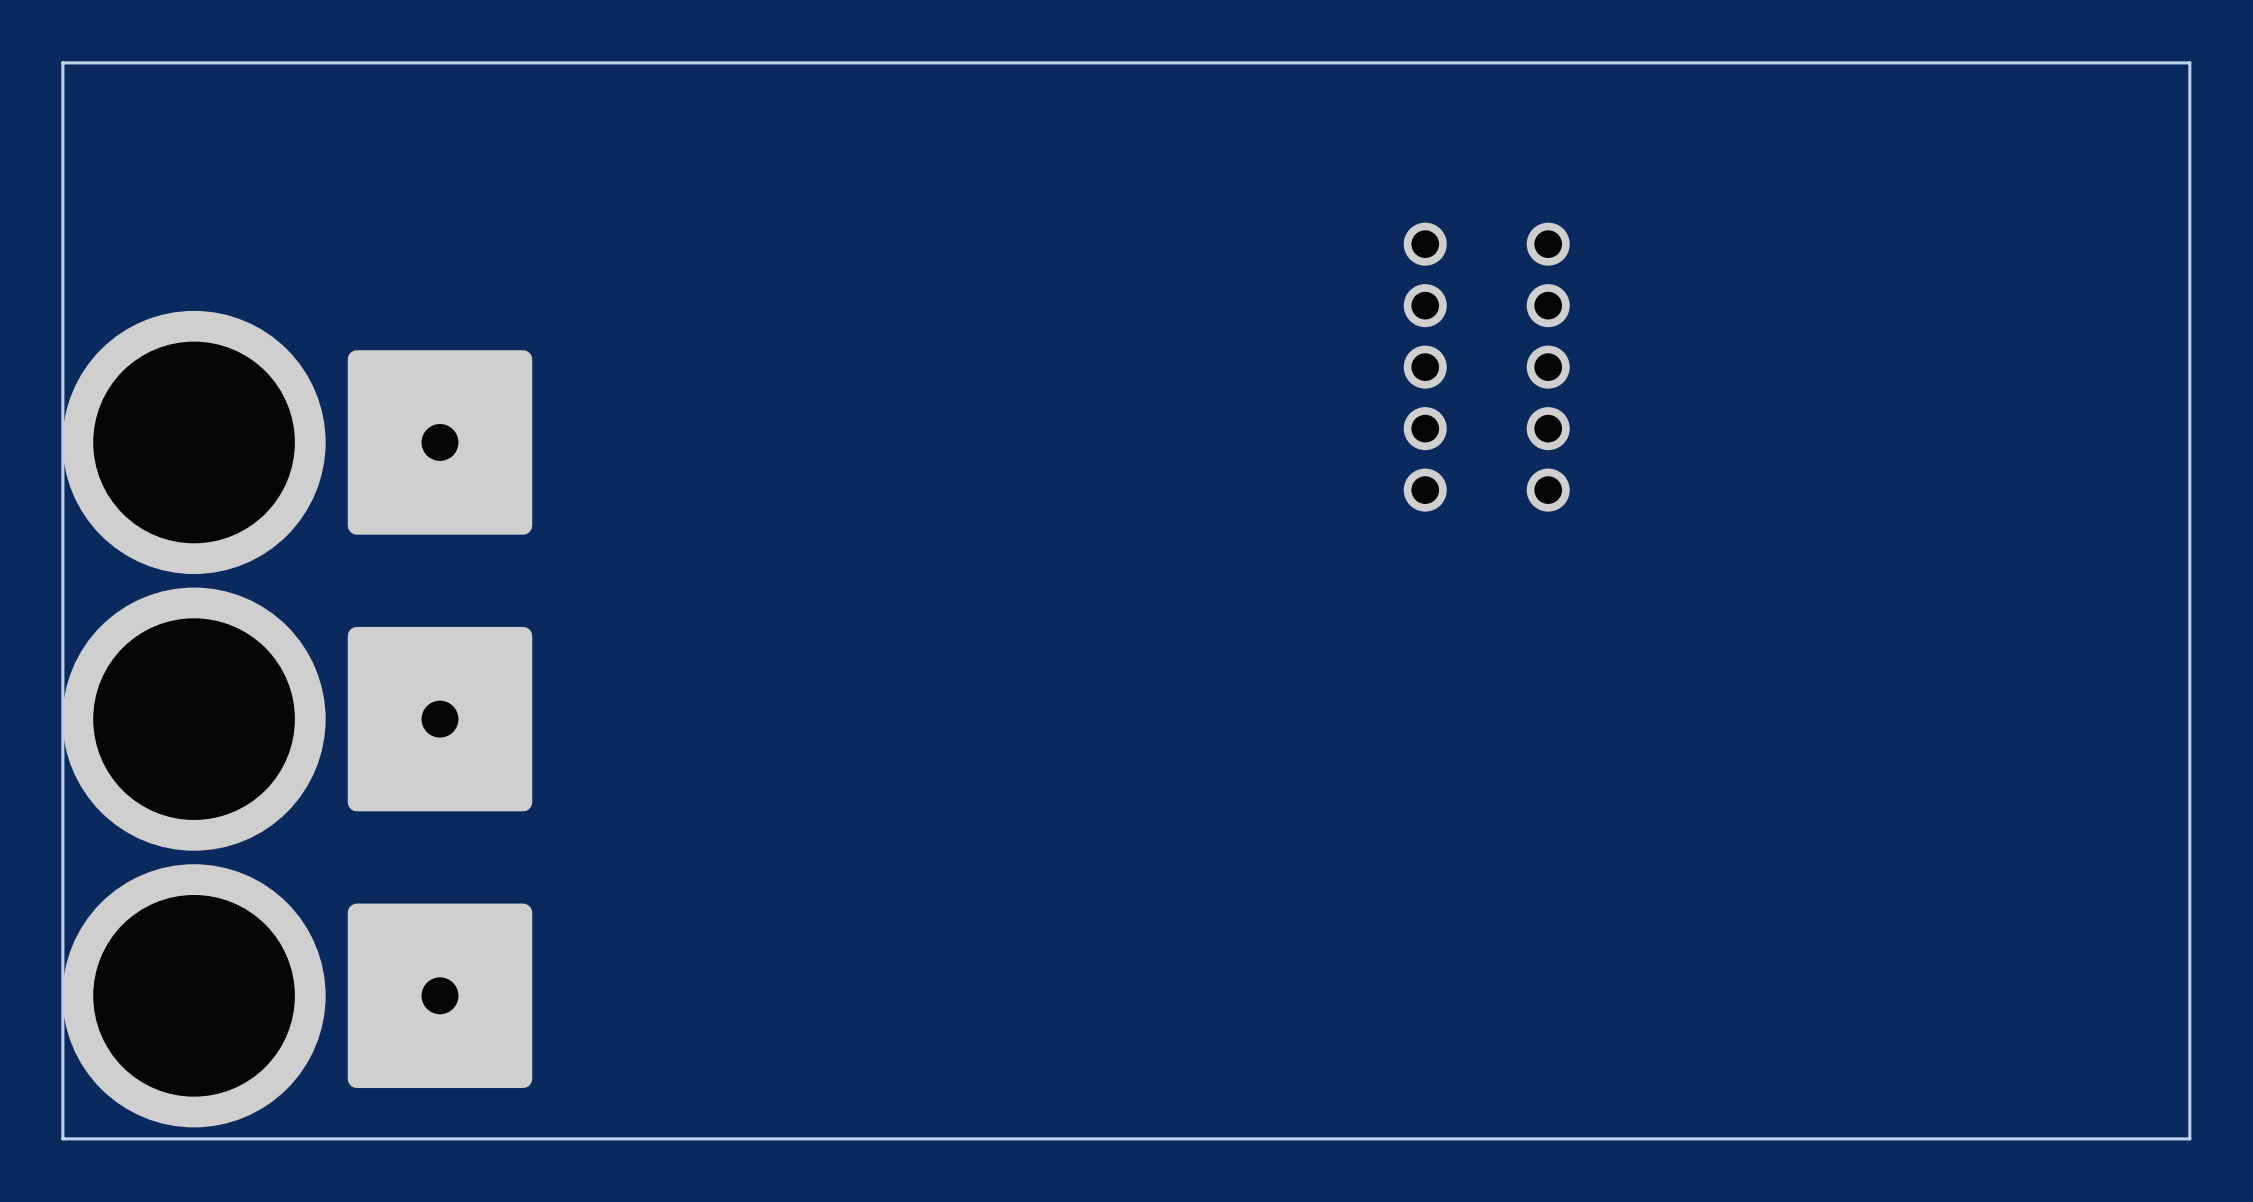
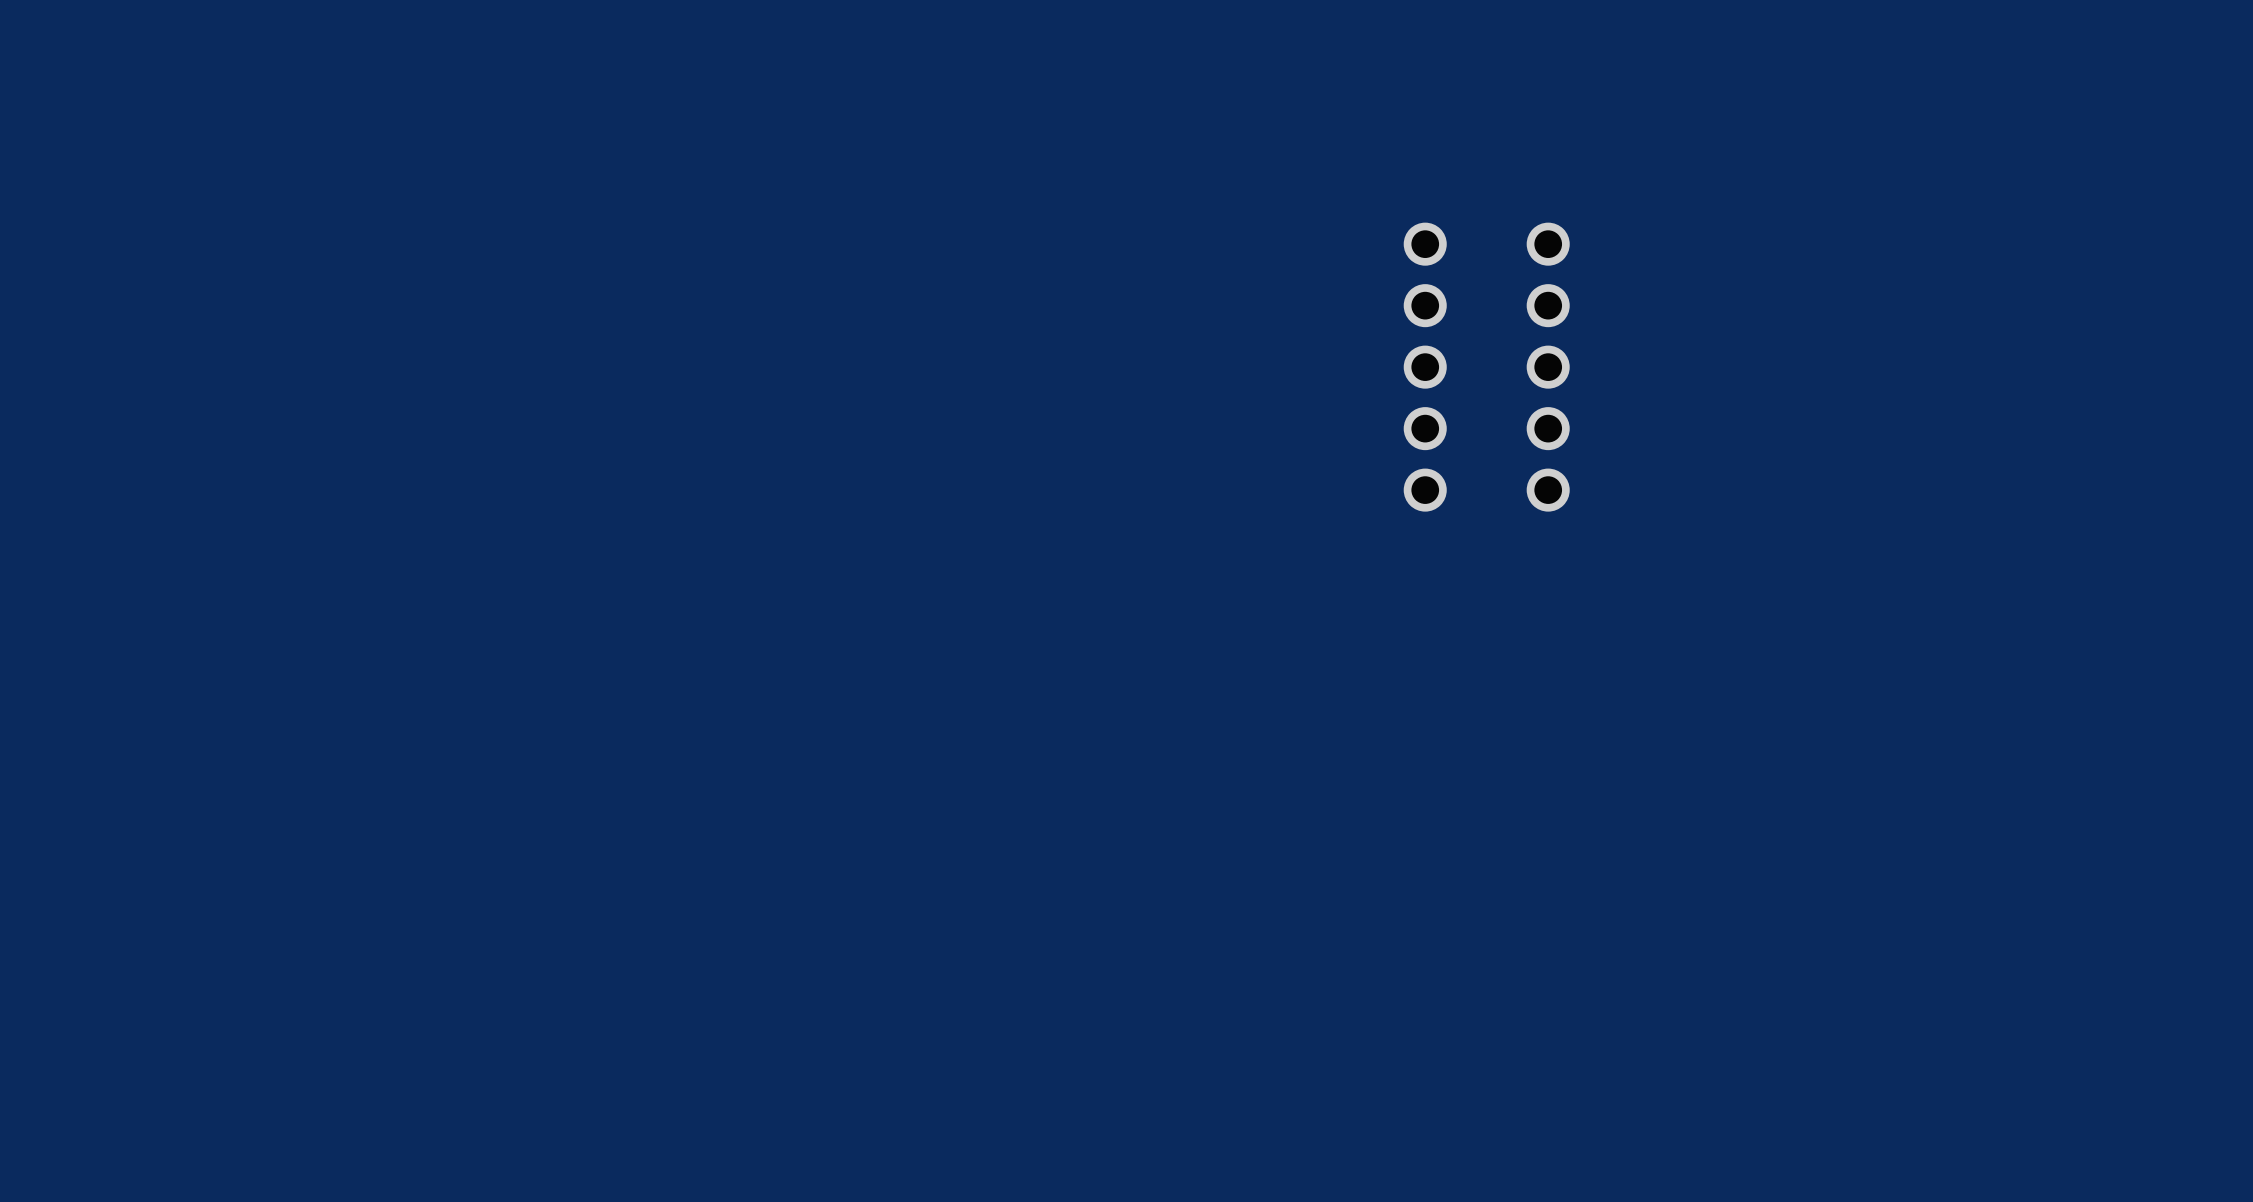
board edge: (2189, 62) (2189, 1138) (62, 1138) (62, 62) (2189, 62) -> none
part: (297, 442) -> none
part: (297, 719) -> none
part: (297, 995) -> none

